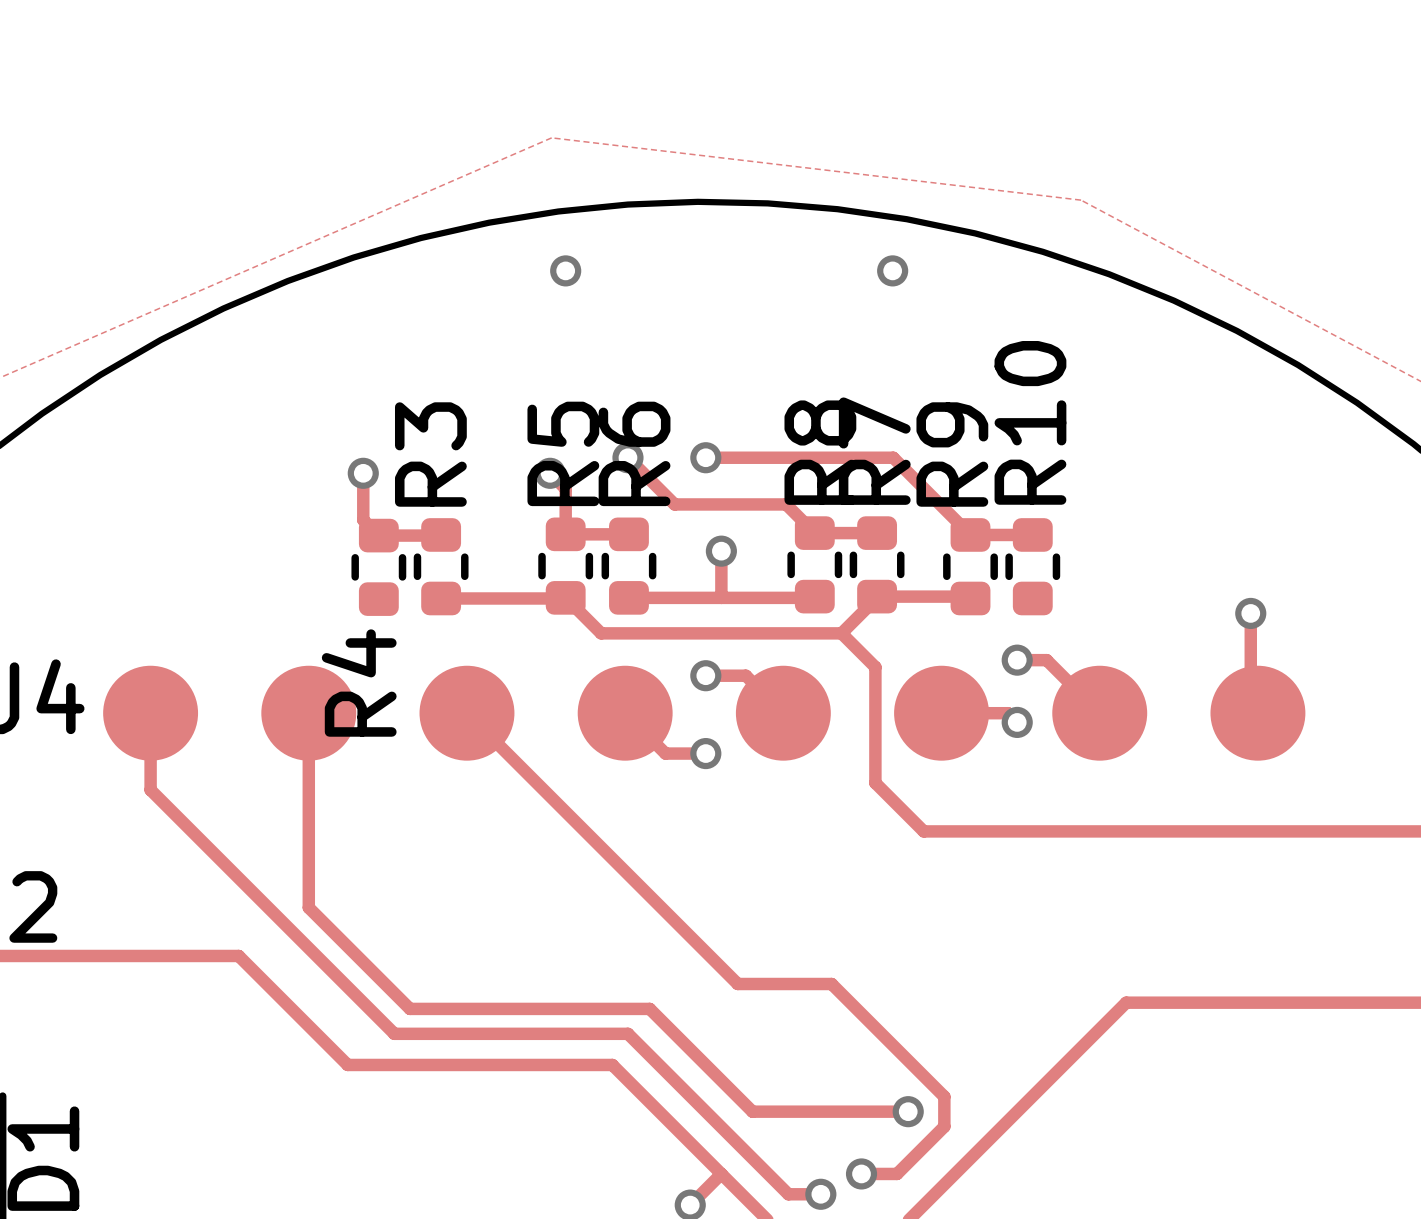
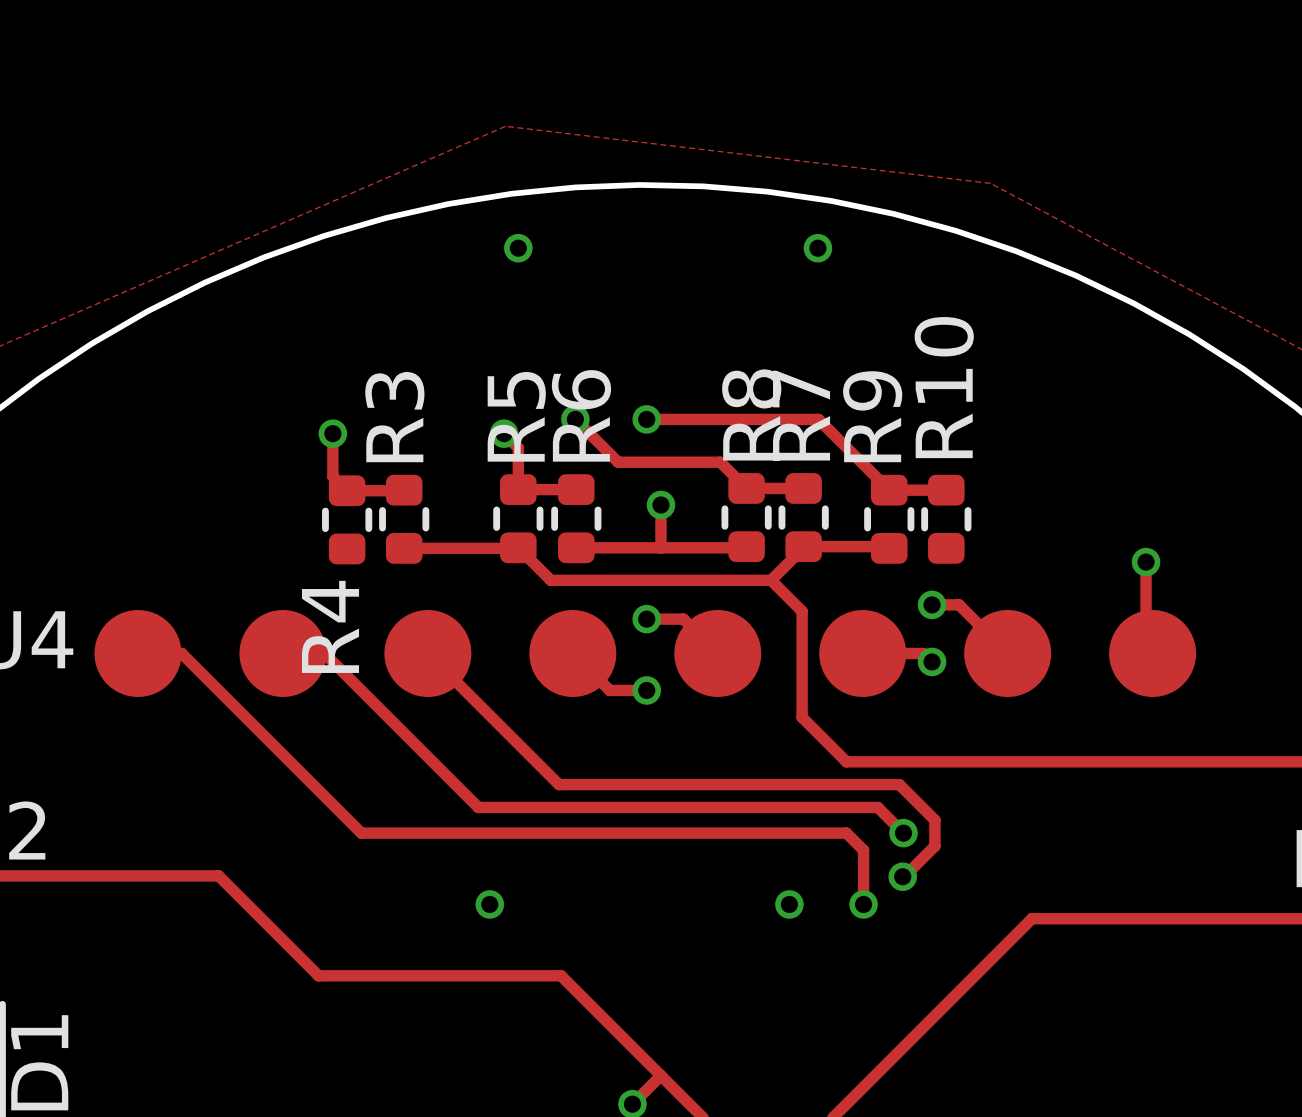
track: (150, 713) (150, 790) (394, 1033) (627, 1033) (788, 1194) (820, 1194) -> (137, 653) (181, 653) (361, 833) (846, 833) (863, 850) (863, 904)
track: (308, 713) (308, 907) (409, 1008) (649, 1008) (752, 1111) (908, 1111) -> (282, 653) (324, 653) (478, 807) (877, 807) (903, 833)
track: (610, 856) (737, 984) (831, 984) (944, 1096) (944, 1126) (897, 1173) (861, 1173) -> (559, 784) (899, 784) (934, 820) (934, 846) (902, 876)
via: none -> (903, 833)
via: none -> (902, 876)
via: none -> (489, 904)
via: none -> (789, 904)
via: none -> (863, 904)
via: (908, 1111) -> none
via: (861, 1173) -> none
via: (820, 1194) -> none

